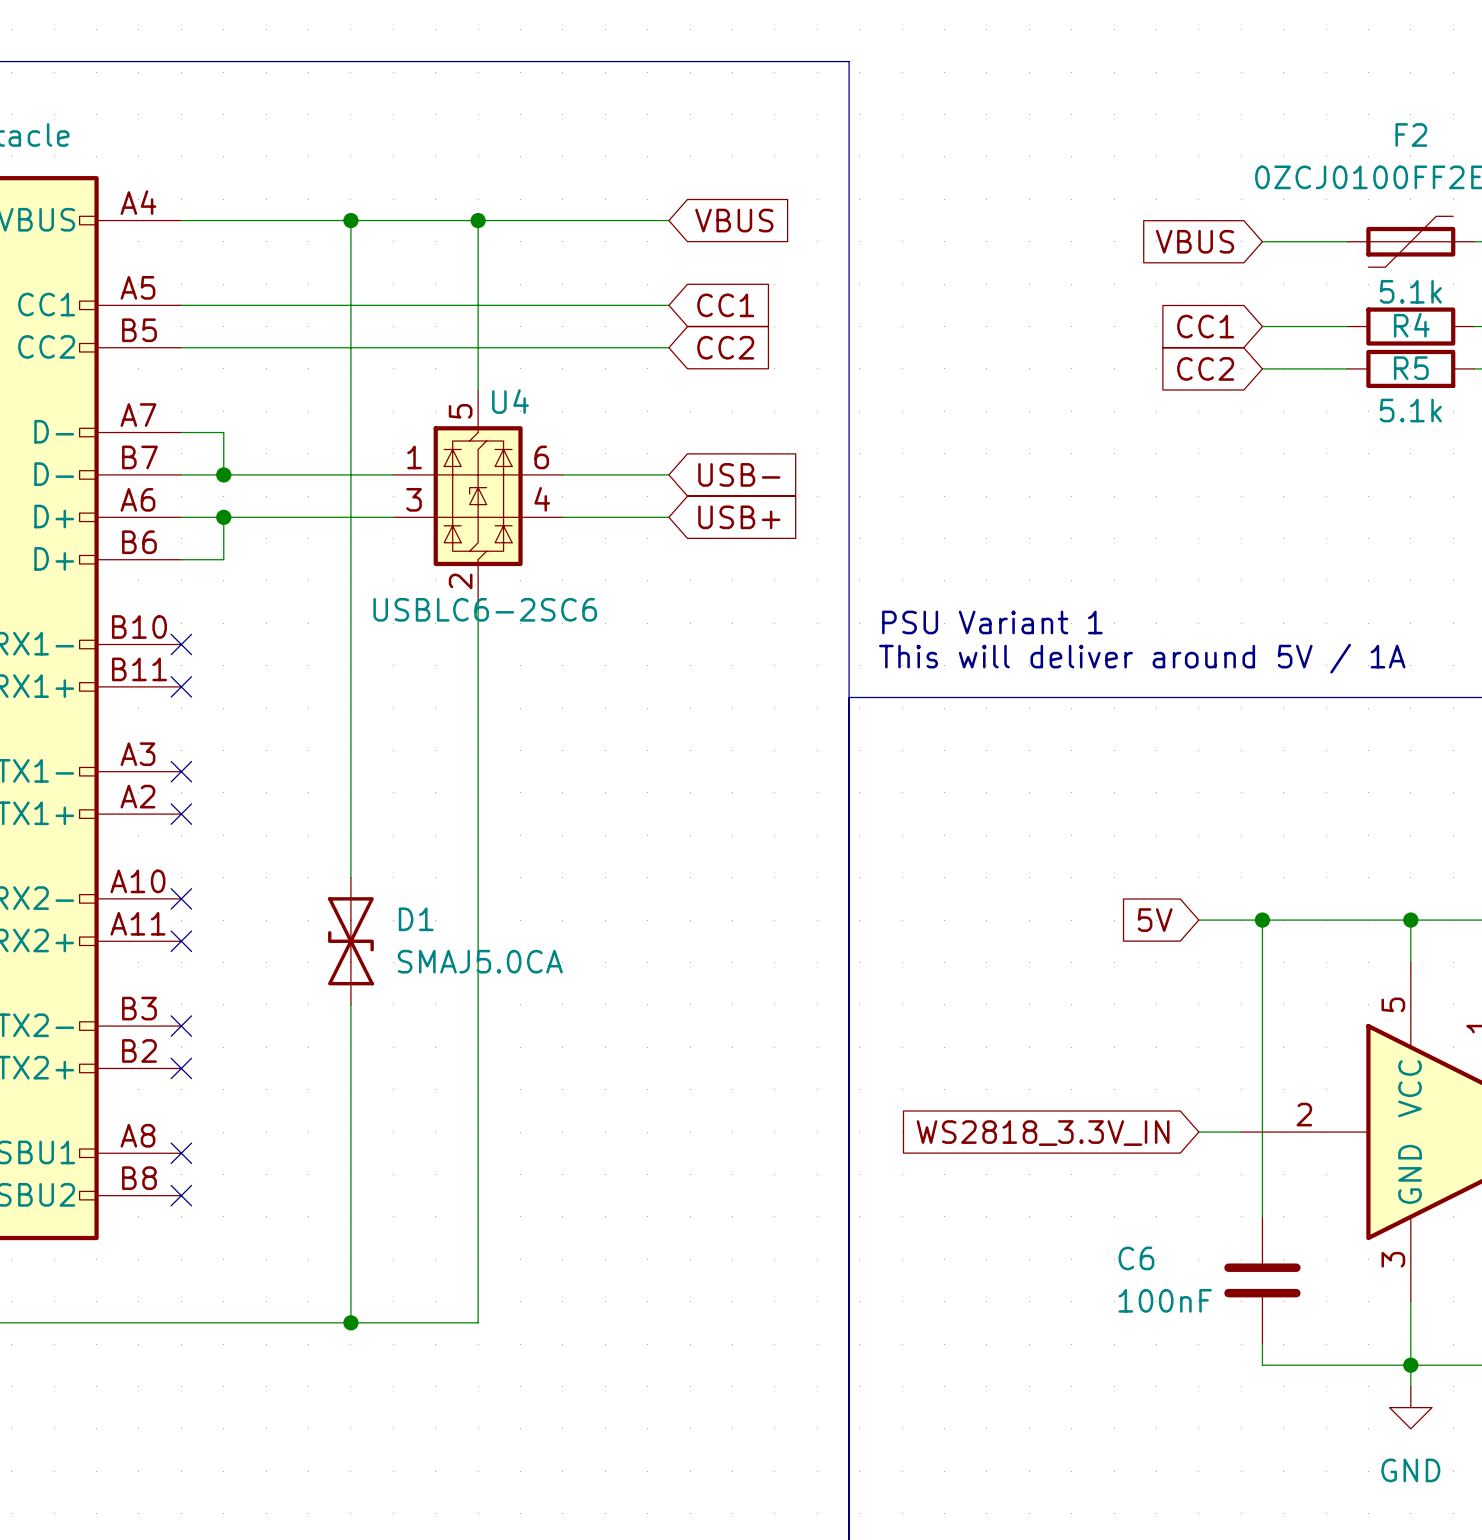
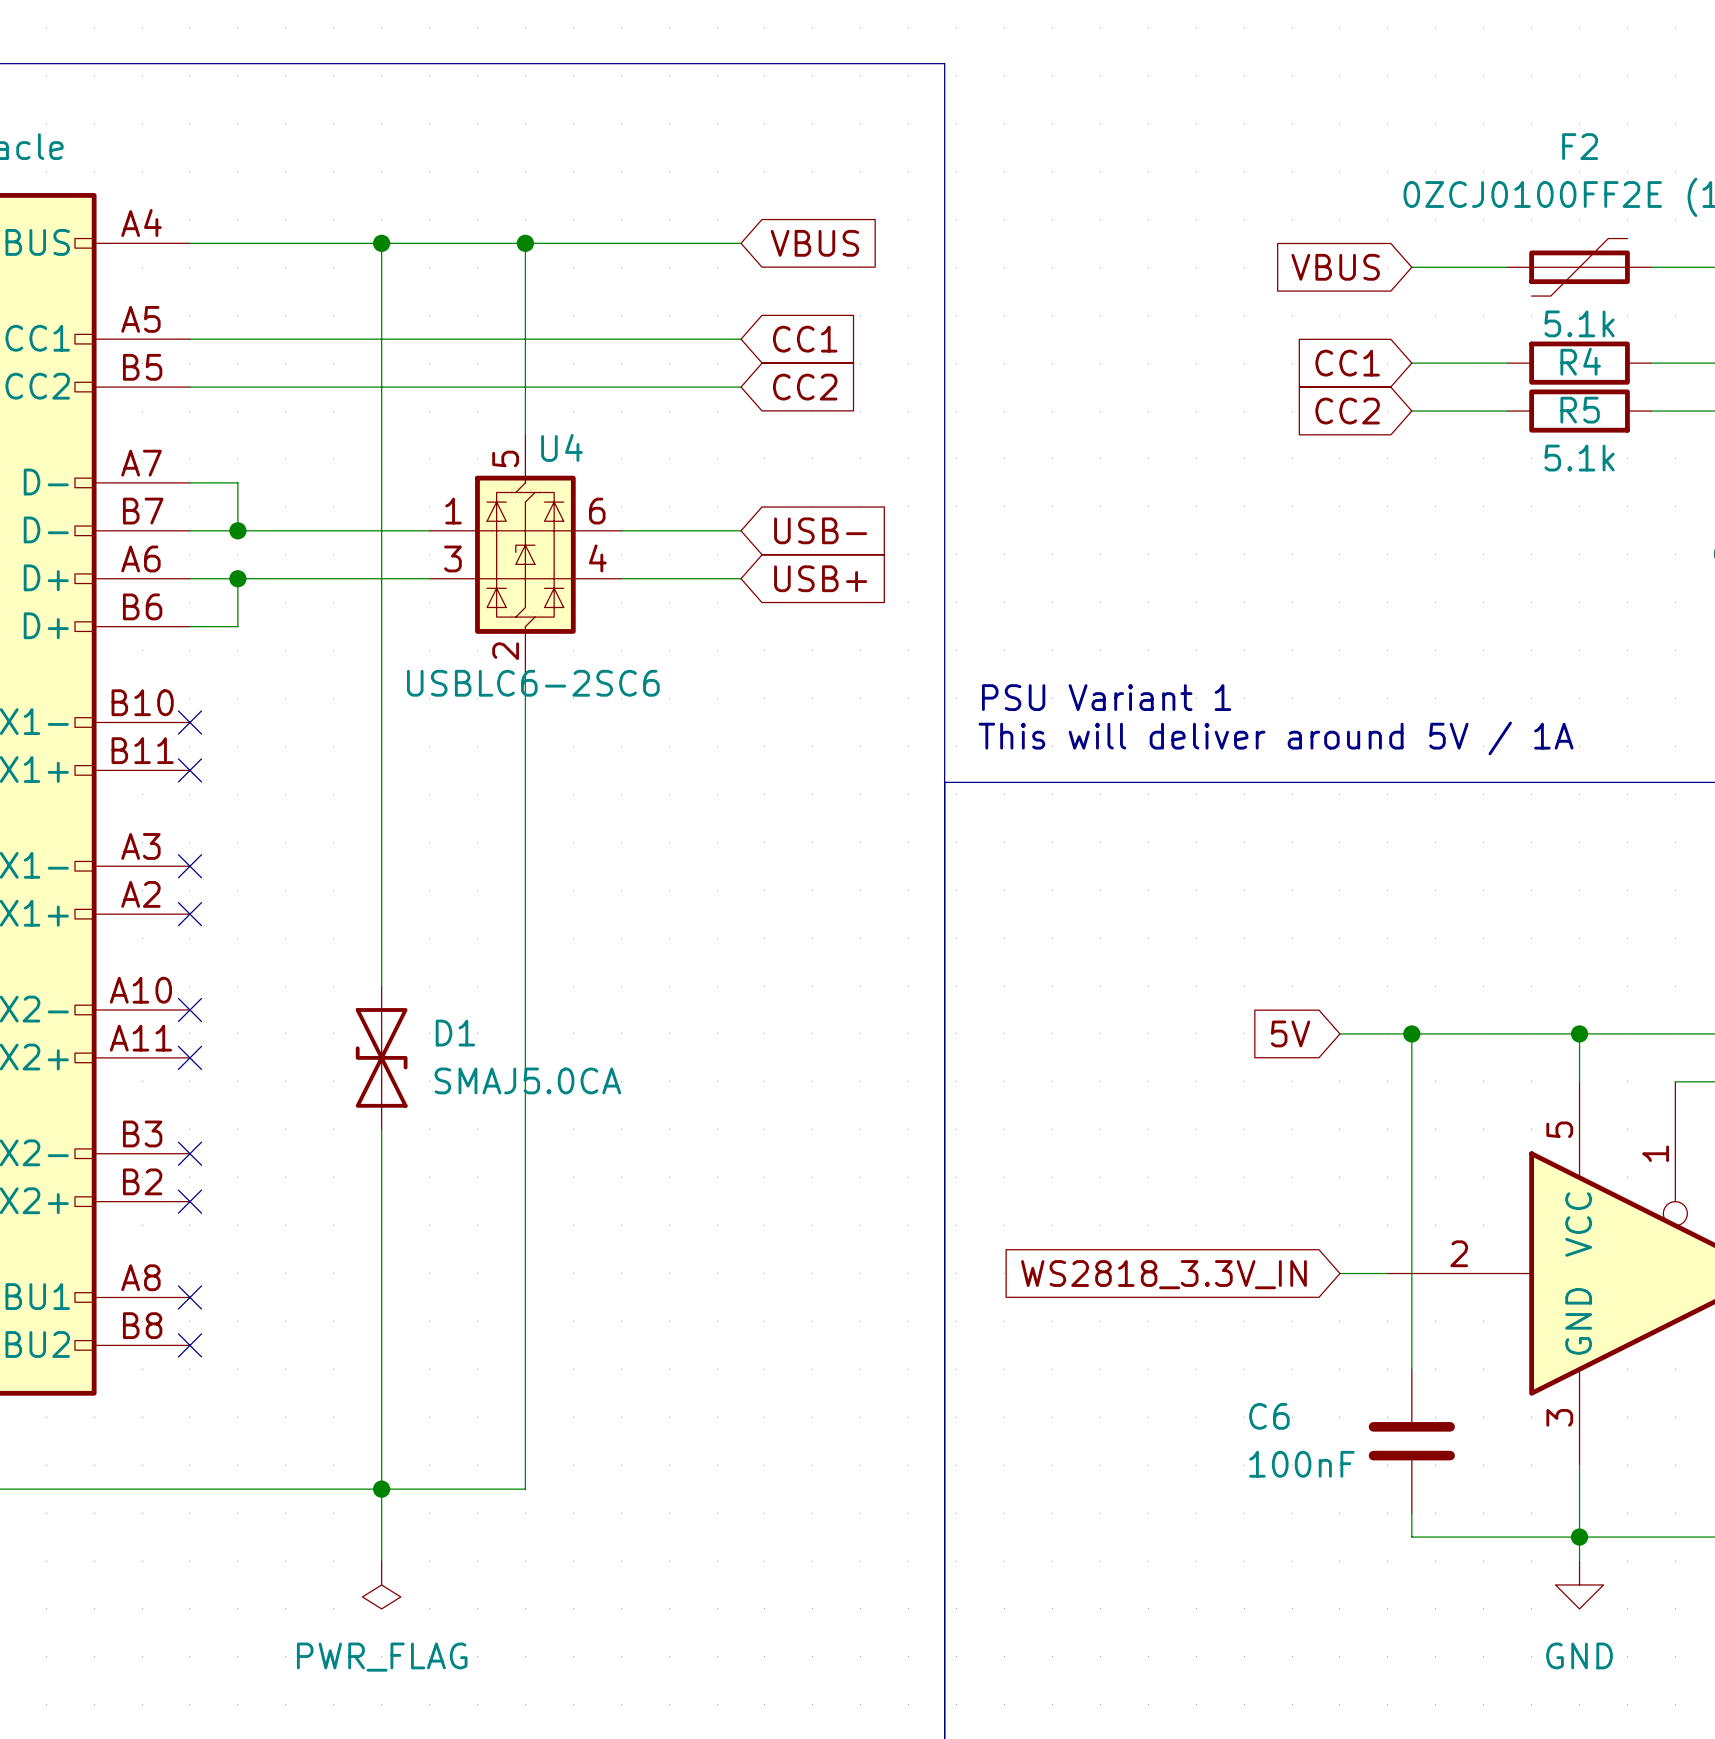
wire: none -> (381, 1489) (381, 1561)
power symbol: none -> PWR_FLAG (381, 1584)

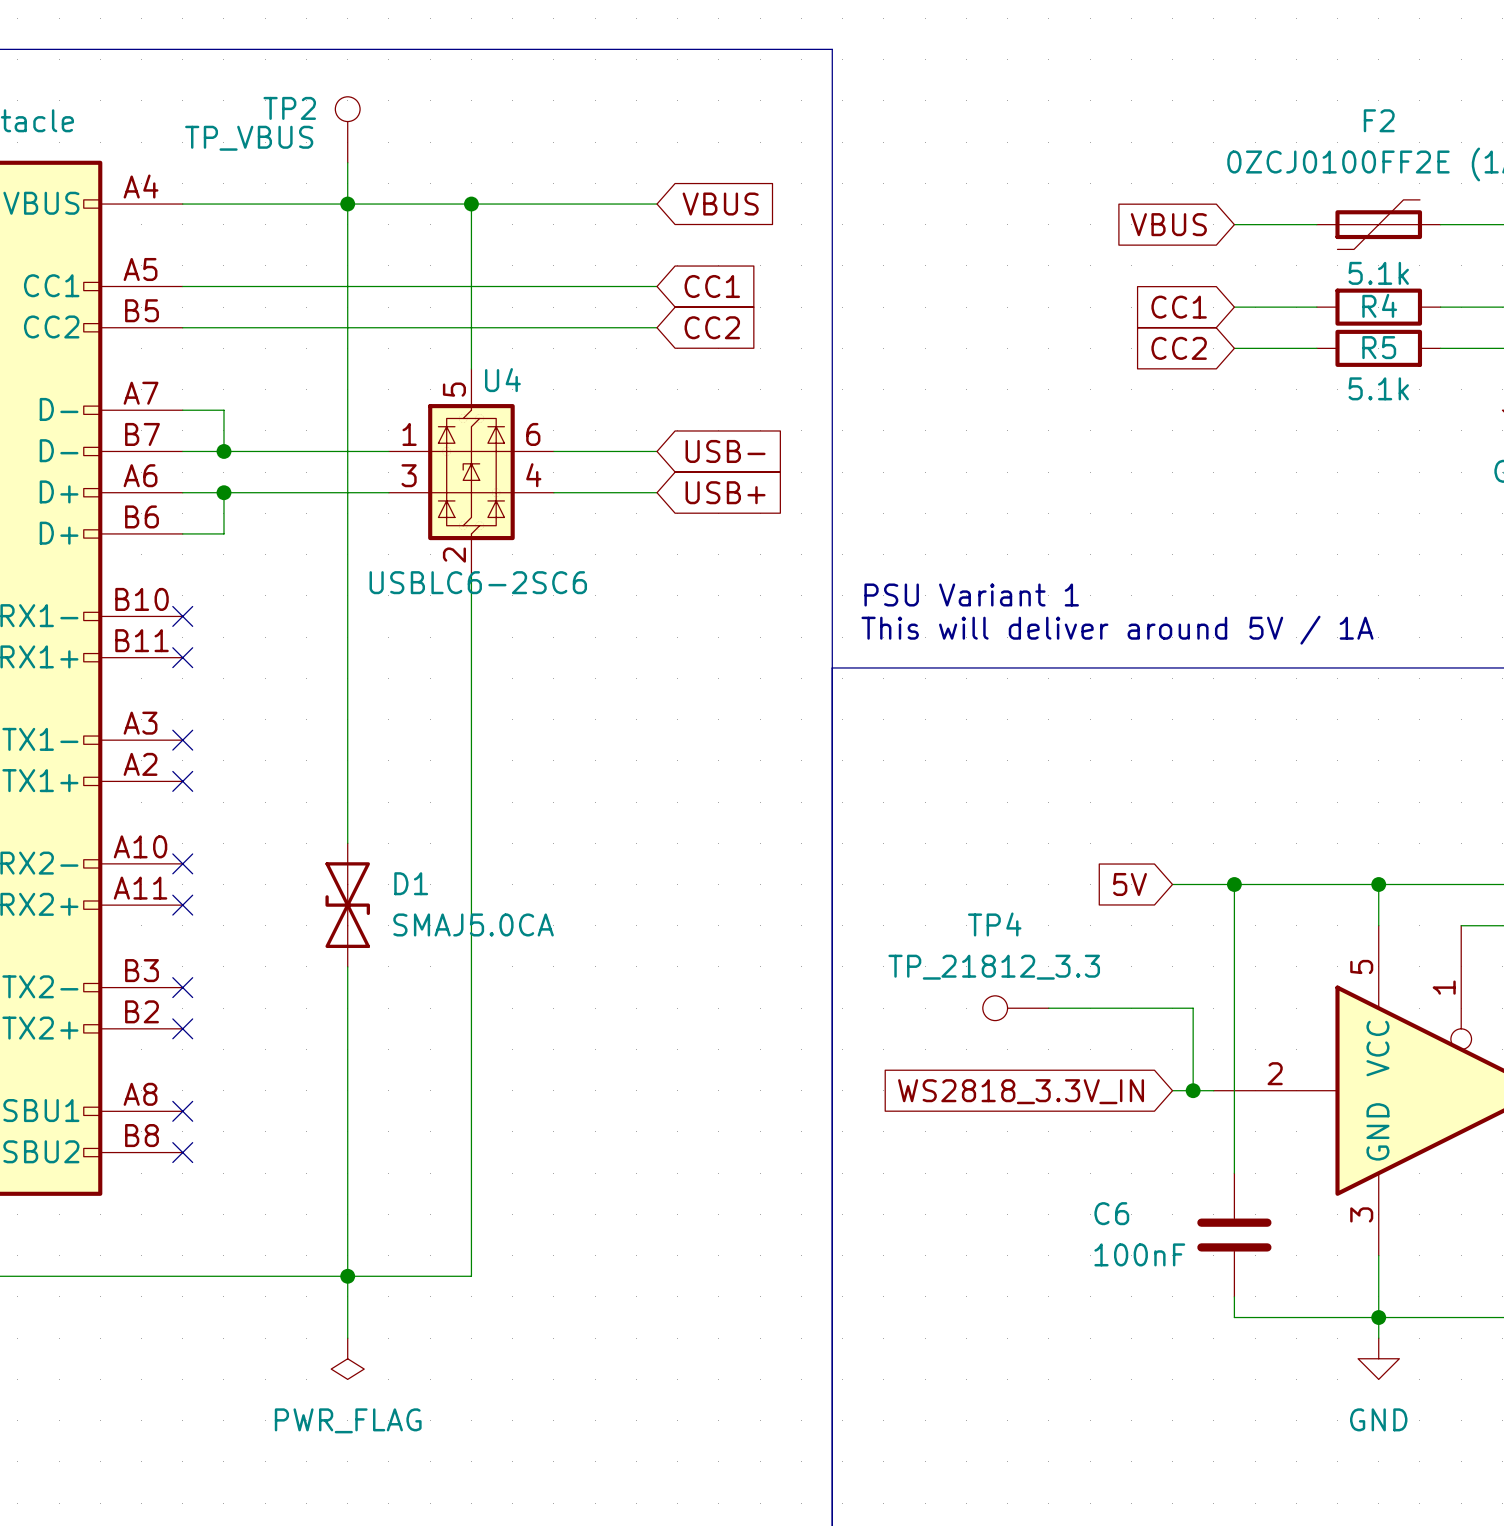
TP2: none -> TP_VBUS (347, 129)
wire: none -> (347, 162) (347, 204)
TP4: none -> TP_21812_3.3 (1015, 1008)
wire: none -> (1048, 1008) (1193, 1008) (1193, 1090)
junction: none -> (1193, 1090)

